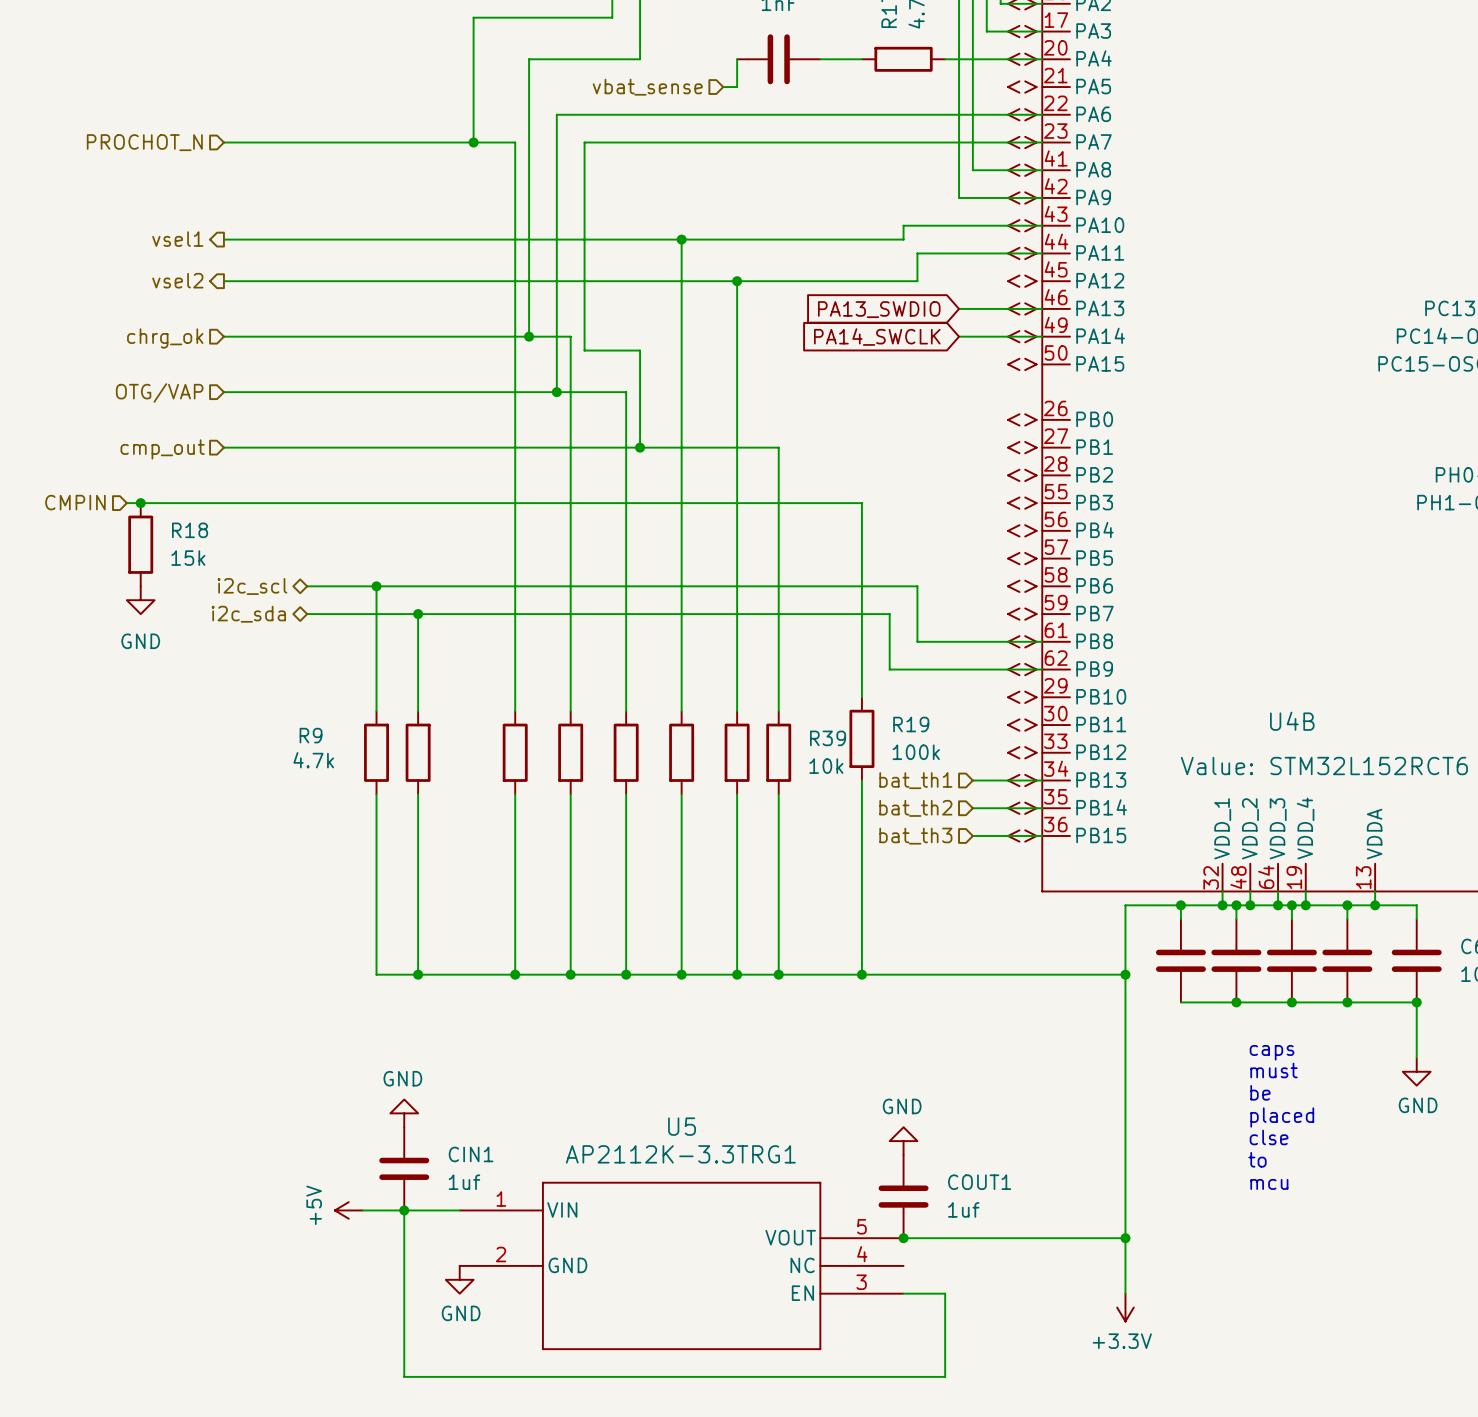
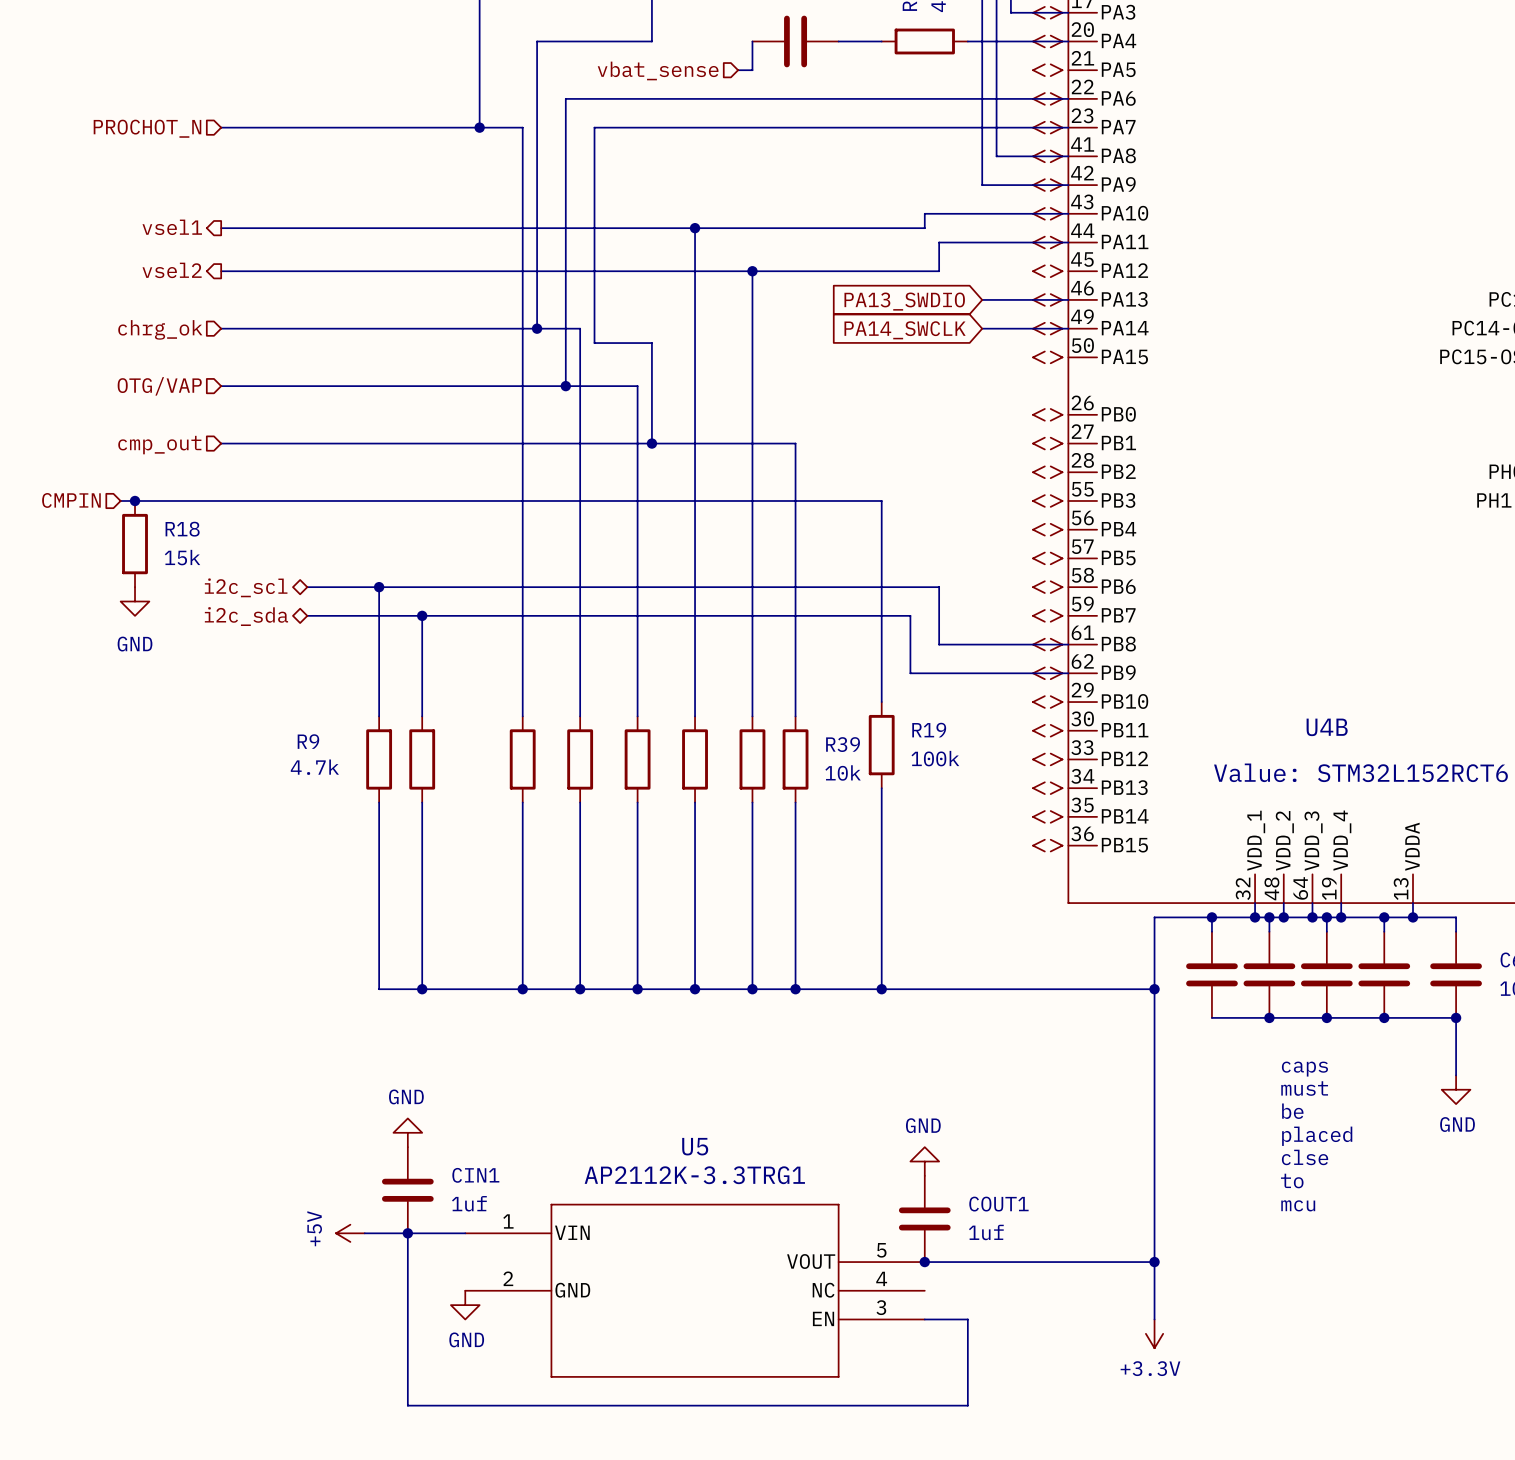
hierarchical label: bat_th1 (915, 780) -> none
wire: (972, 780) (1042, 780) -> none
hierarchical label: bat_th2 (915, 808) -> none
wire: (972, 808) (1042, 808) -> none
wire: (972, 835) (1042, 835) -> none
hierarchical label: bat_th3 (915, 836) -> none

